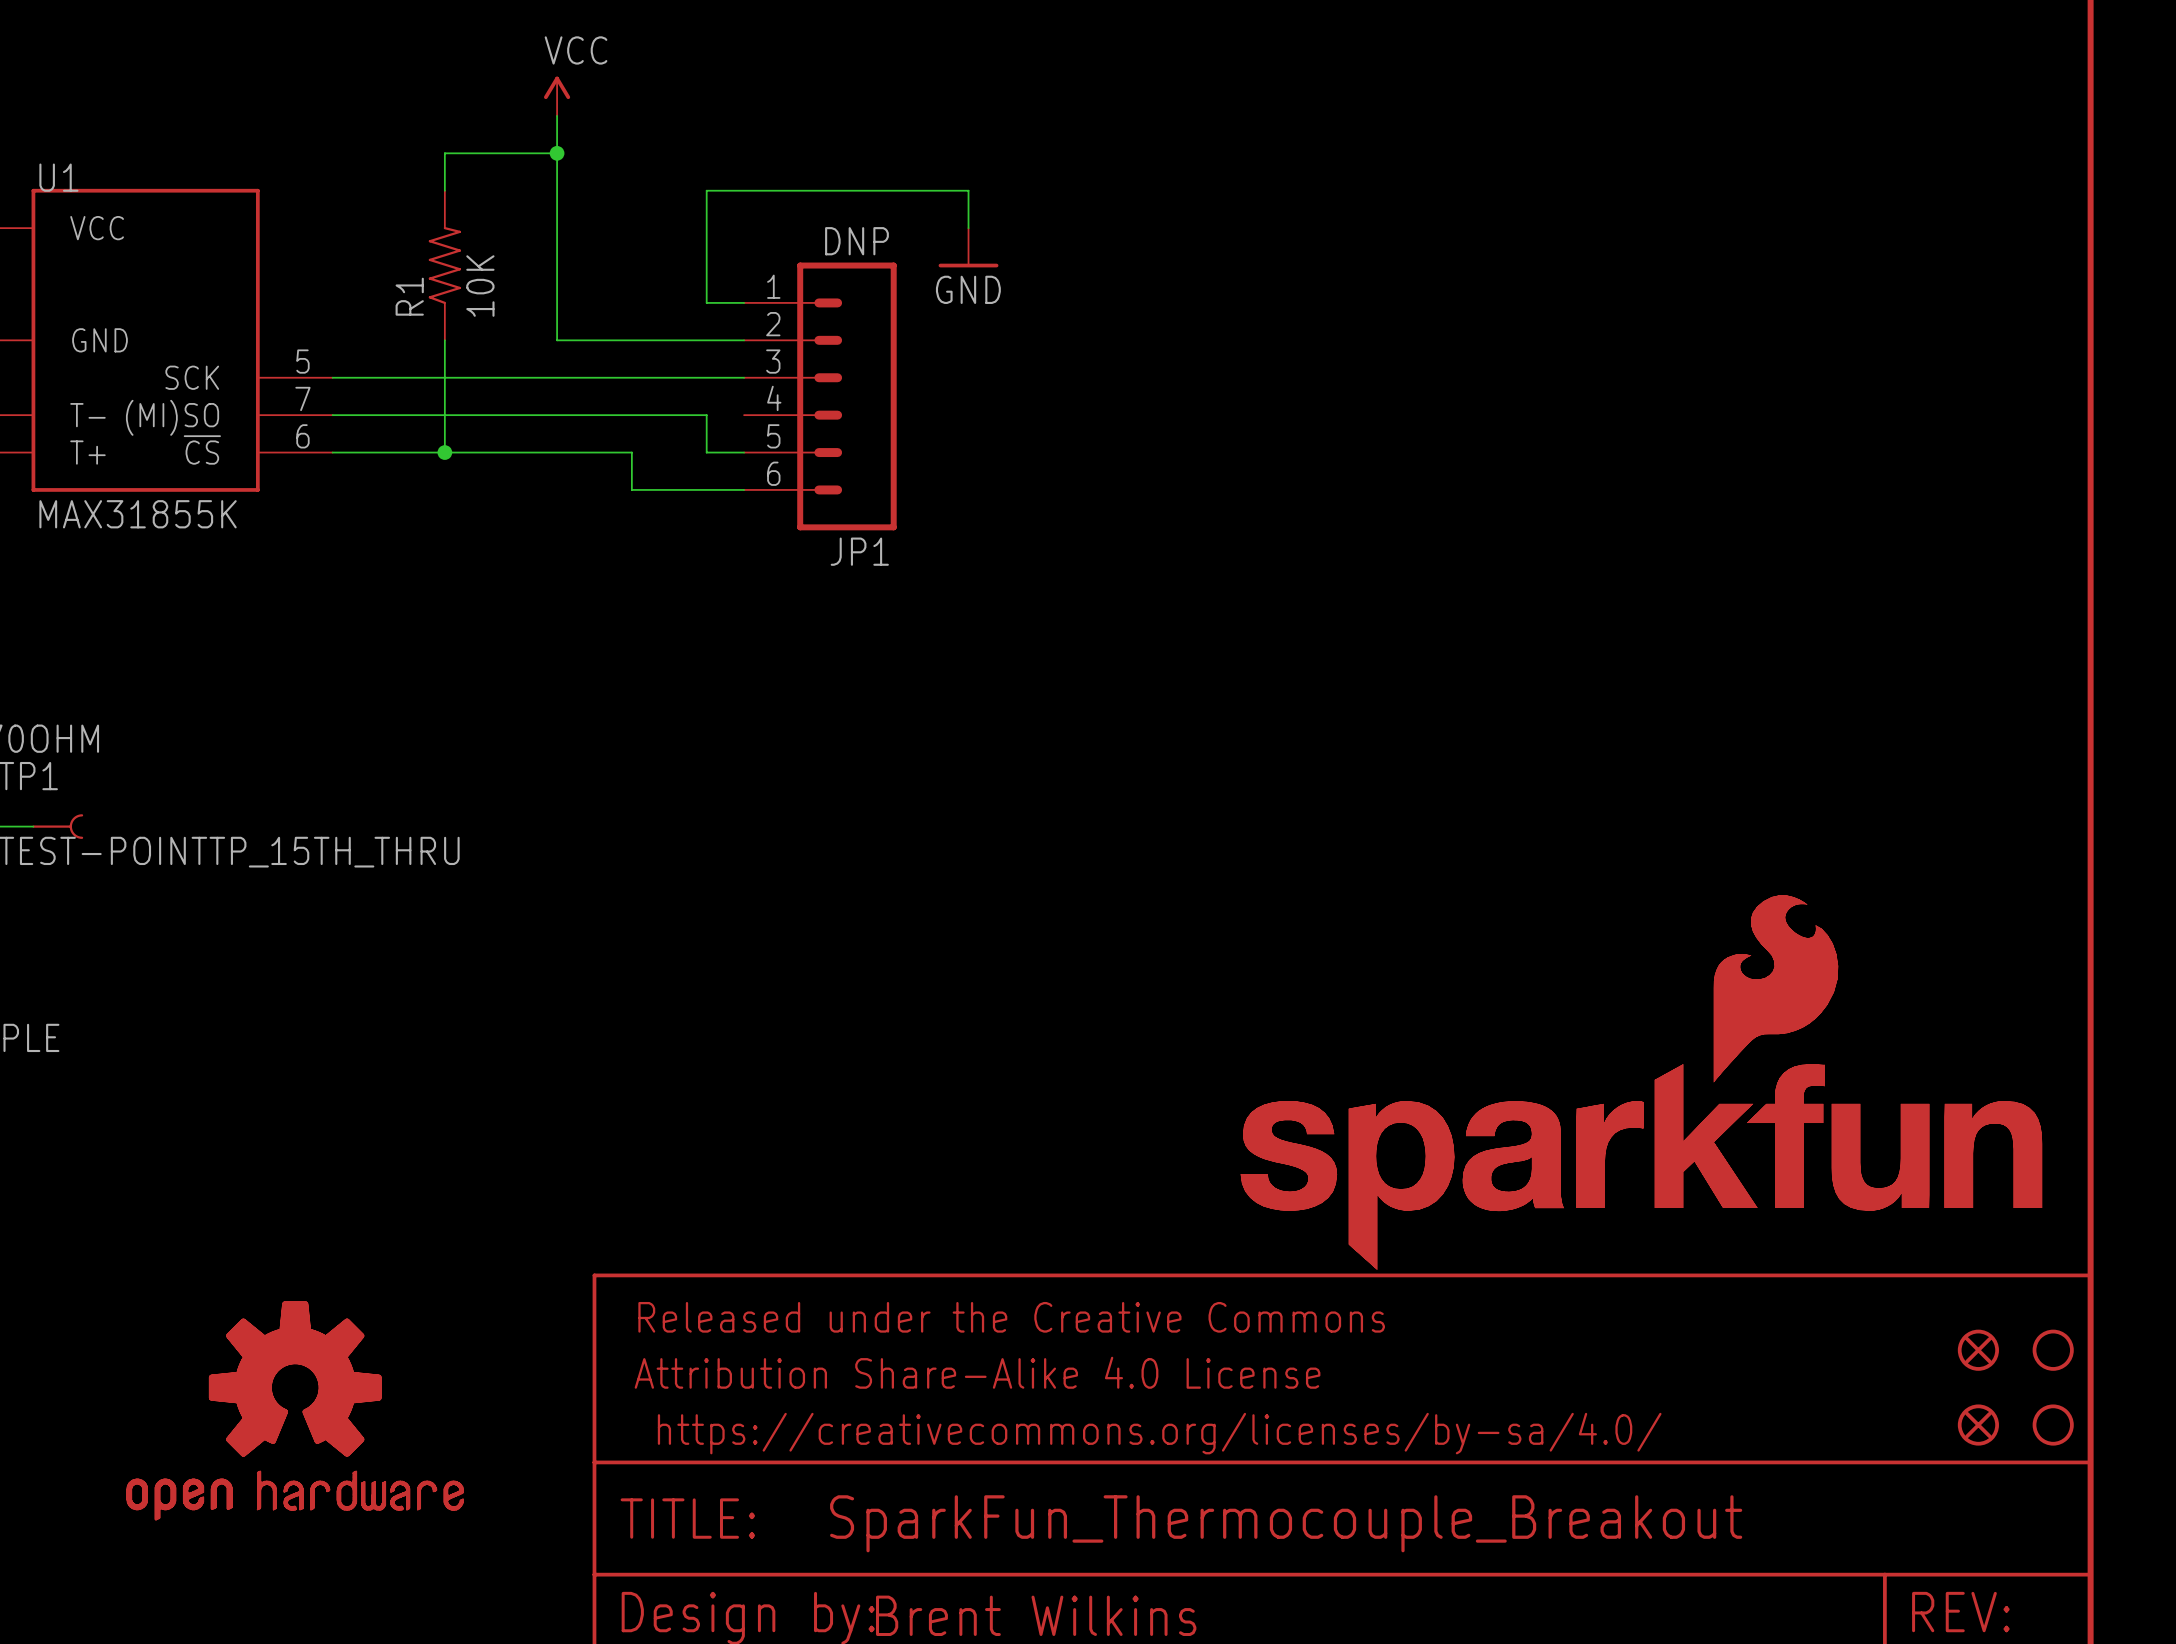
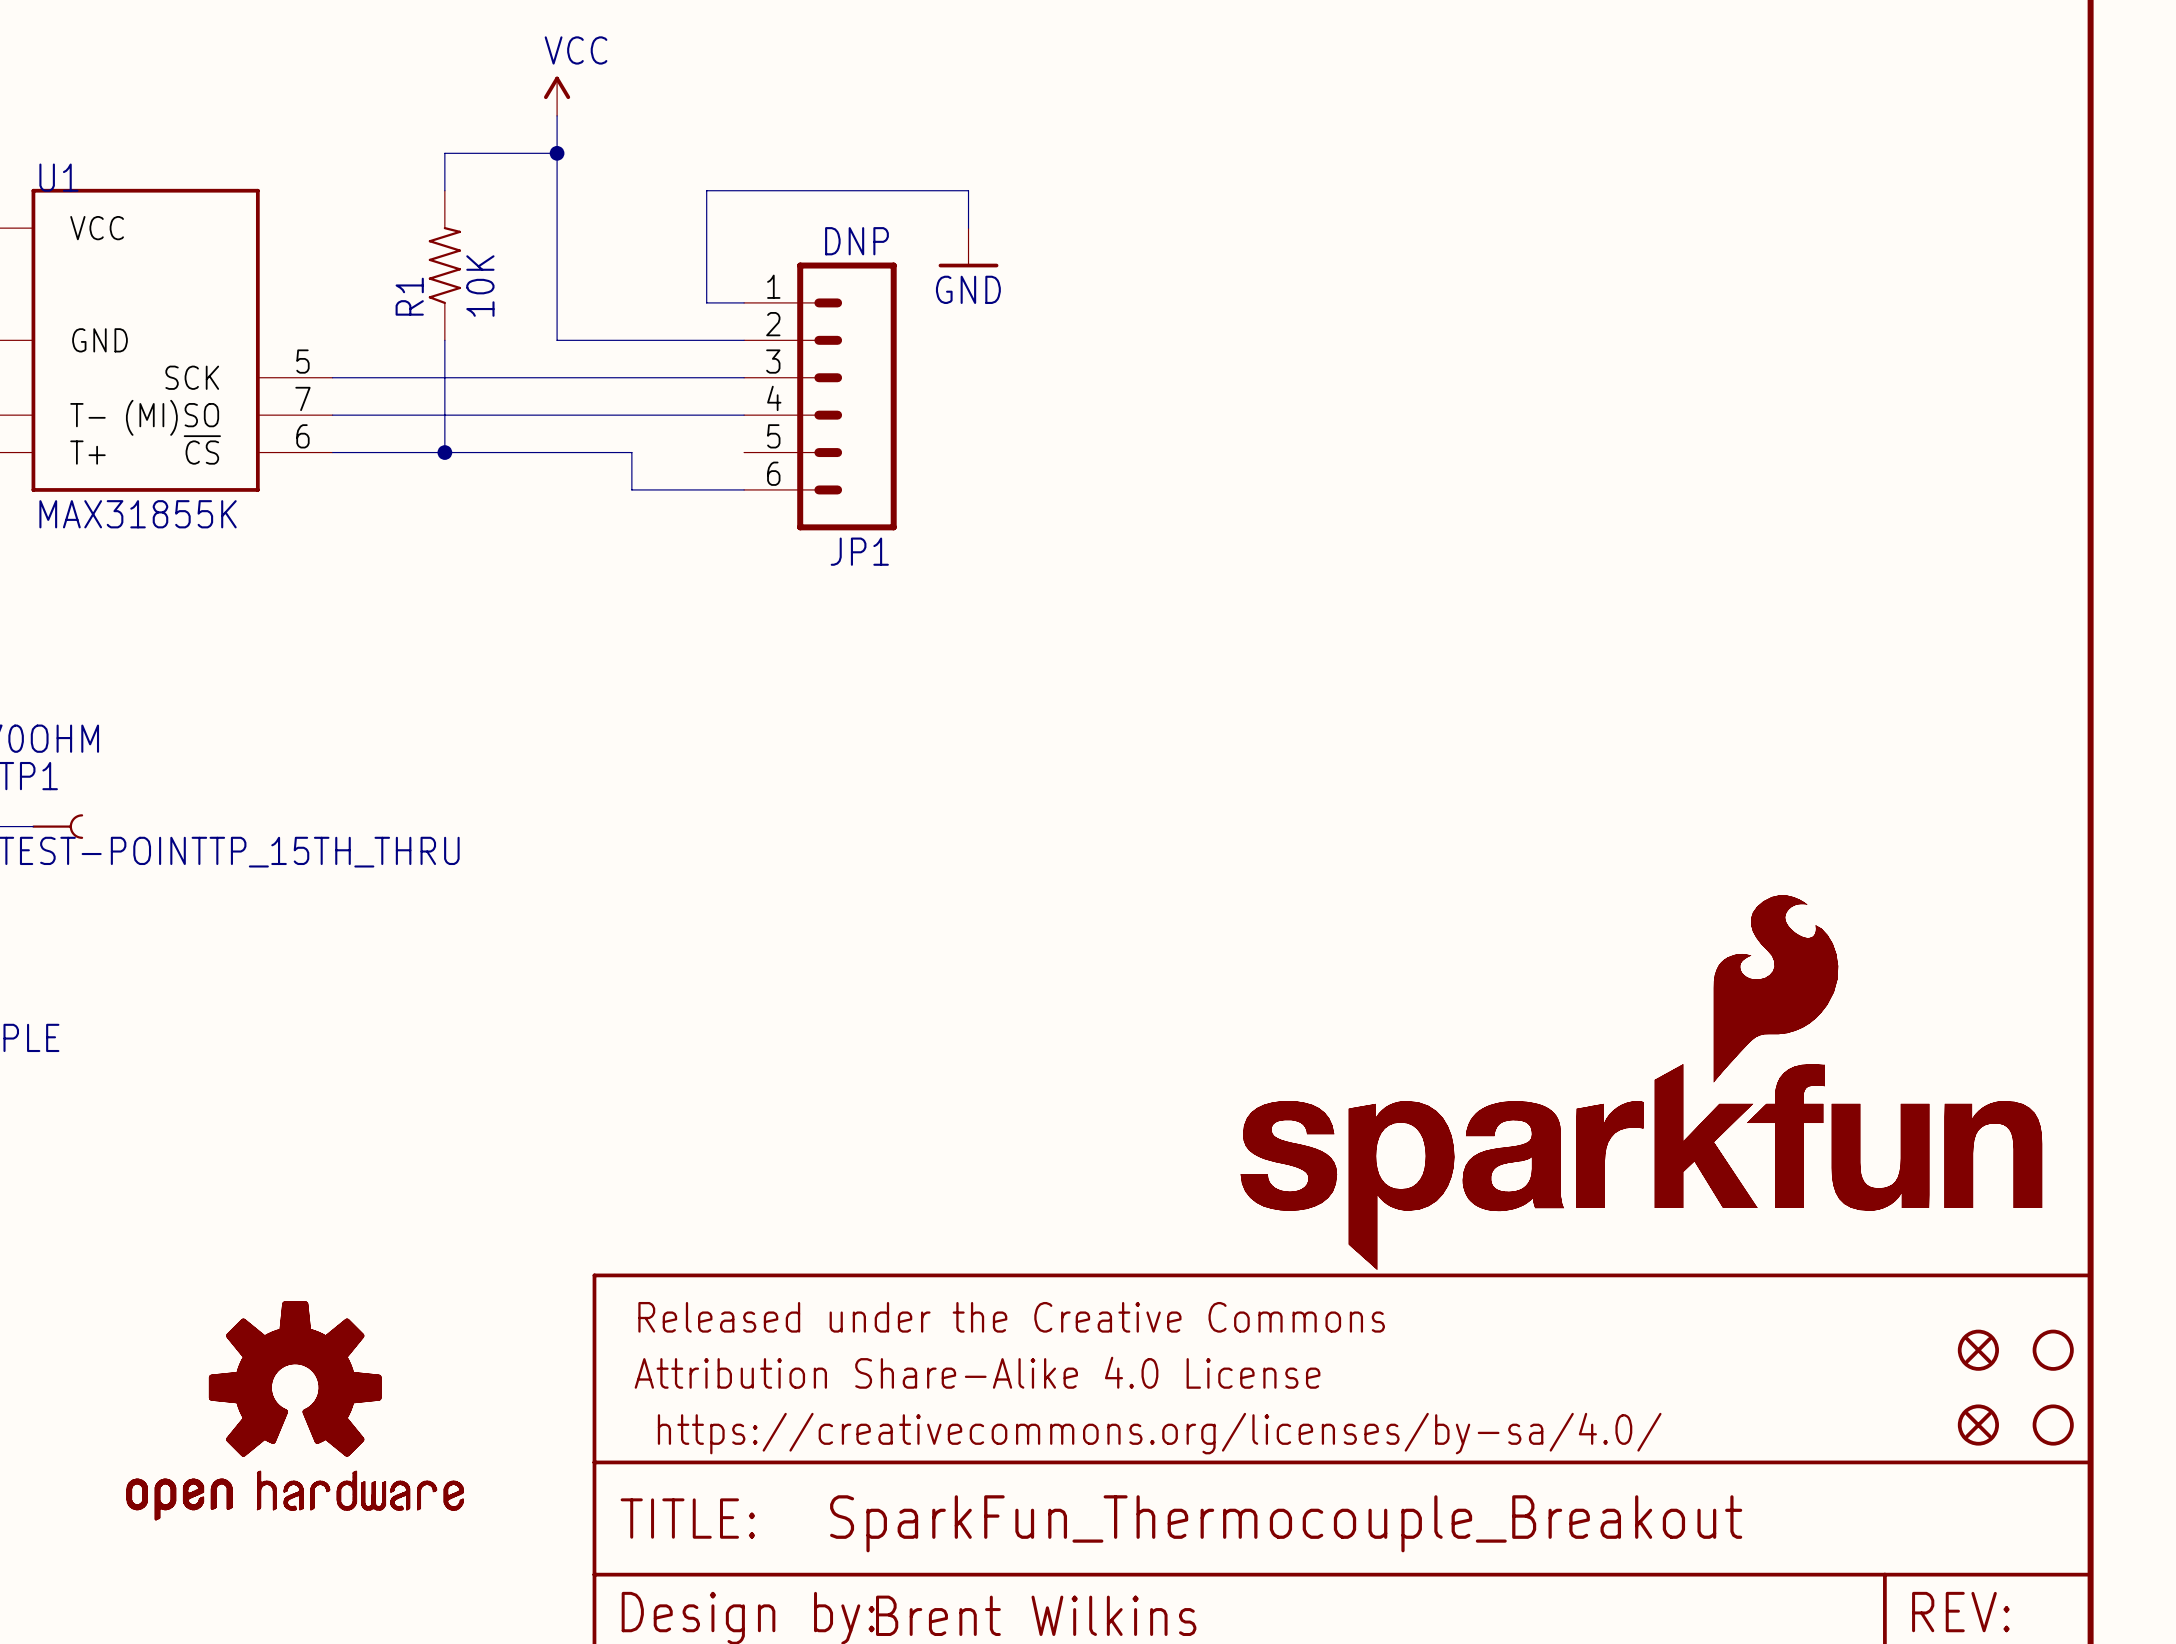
wire: (706, 415) (706, 452) (744, 452) -> (706, 415) (744, 415)

